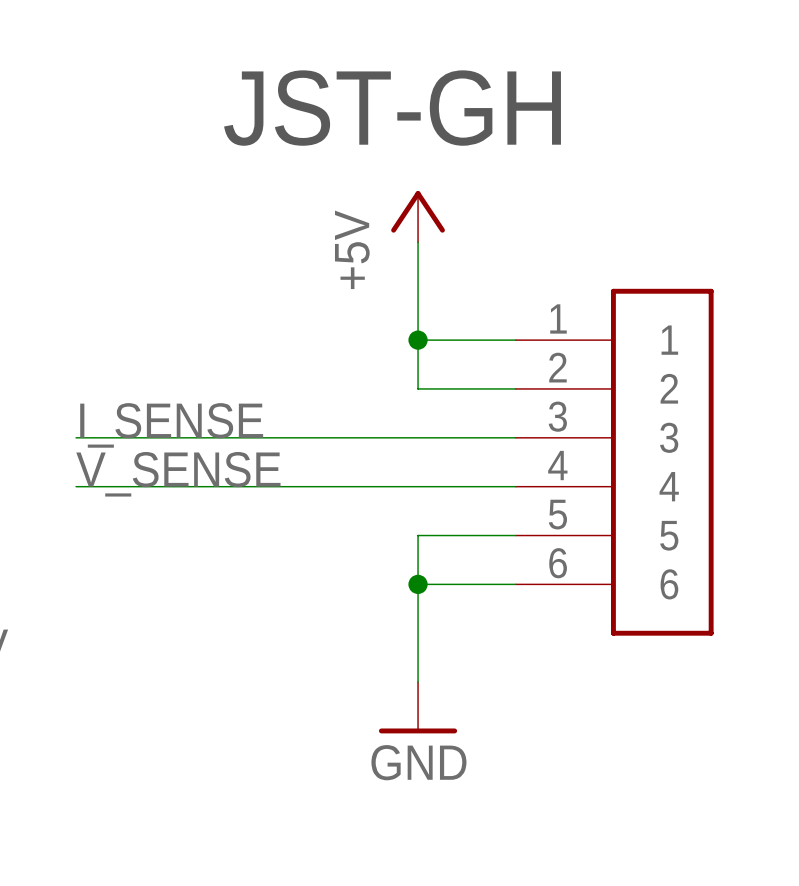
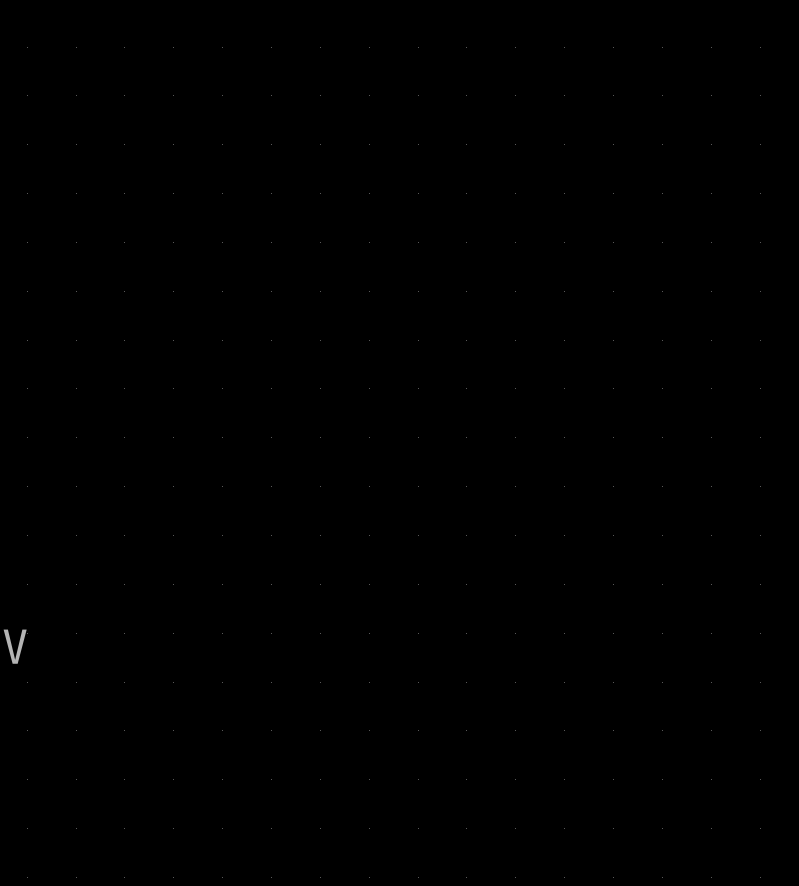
text: JST-GH (392, 108) -> none
power symbol: +5V (418, 216) -> none
wire: (418, 242) (418, 388) (515, 388) -> none
wire: (418, 340) (515, 340) -> none
junction: (418, 340) -> none
label: I_SENSE (171, 425) -> none
wire: (76, 437) (515, 437) -> none
part: (614, 462) -> none
label: V_SENSE (178, 474) -> none
wire: (76, 486) (515, 486) -> none
wire: (515, 535) (418, 535) (418, 682) -> none
wire: (418, 584) (515, 584) -> none
junction: (418, 584) -> none
power symbol: GND (418, 707) -> none

